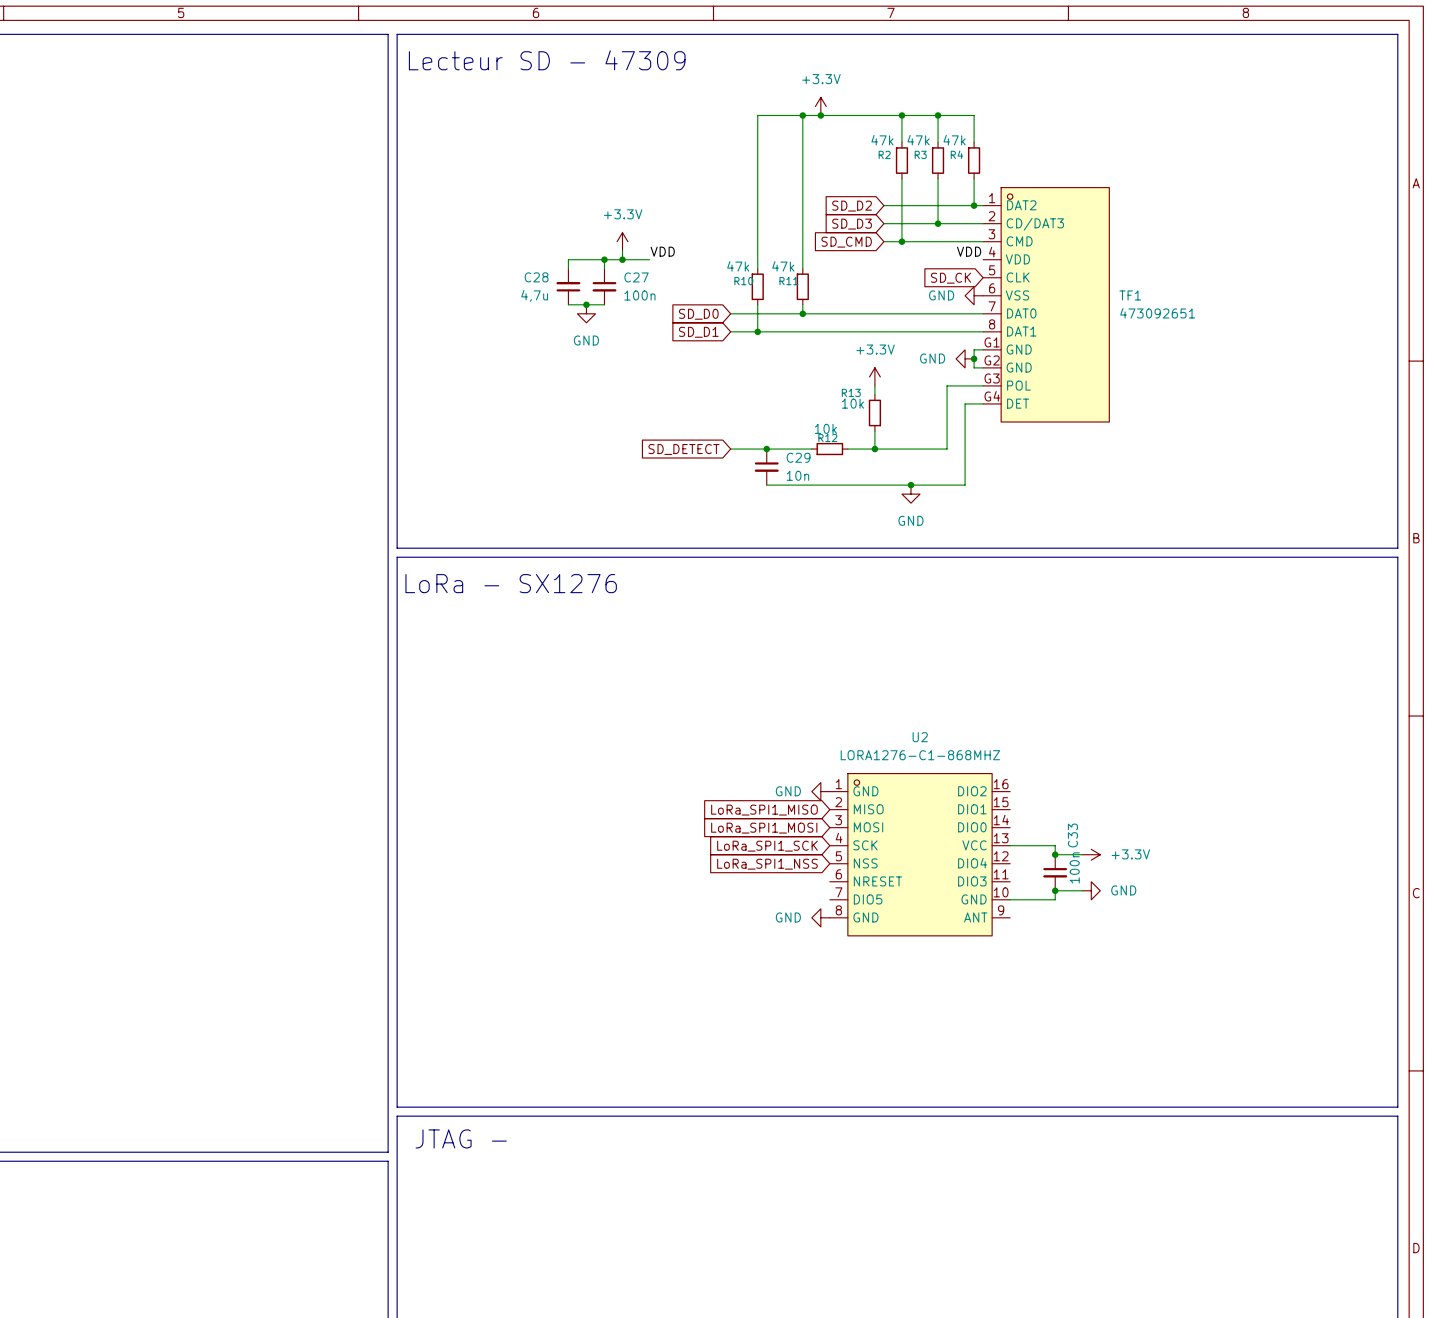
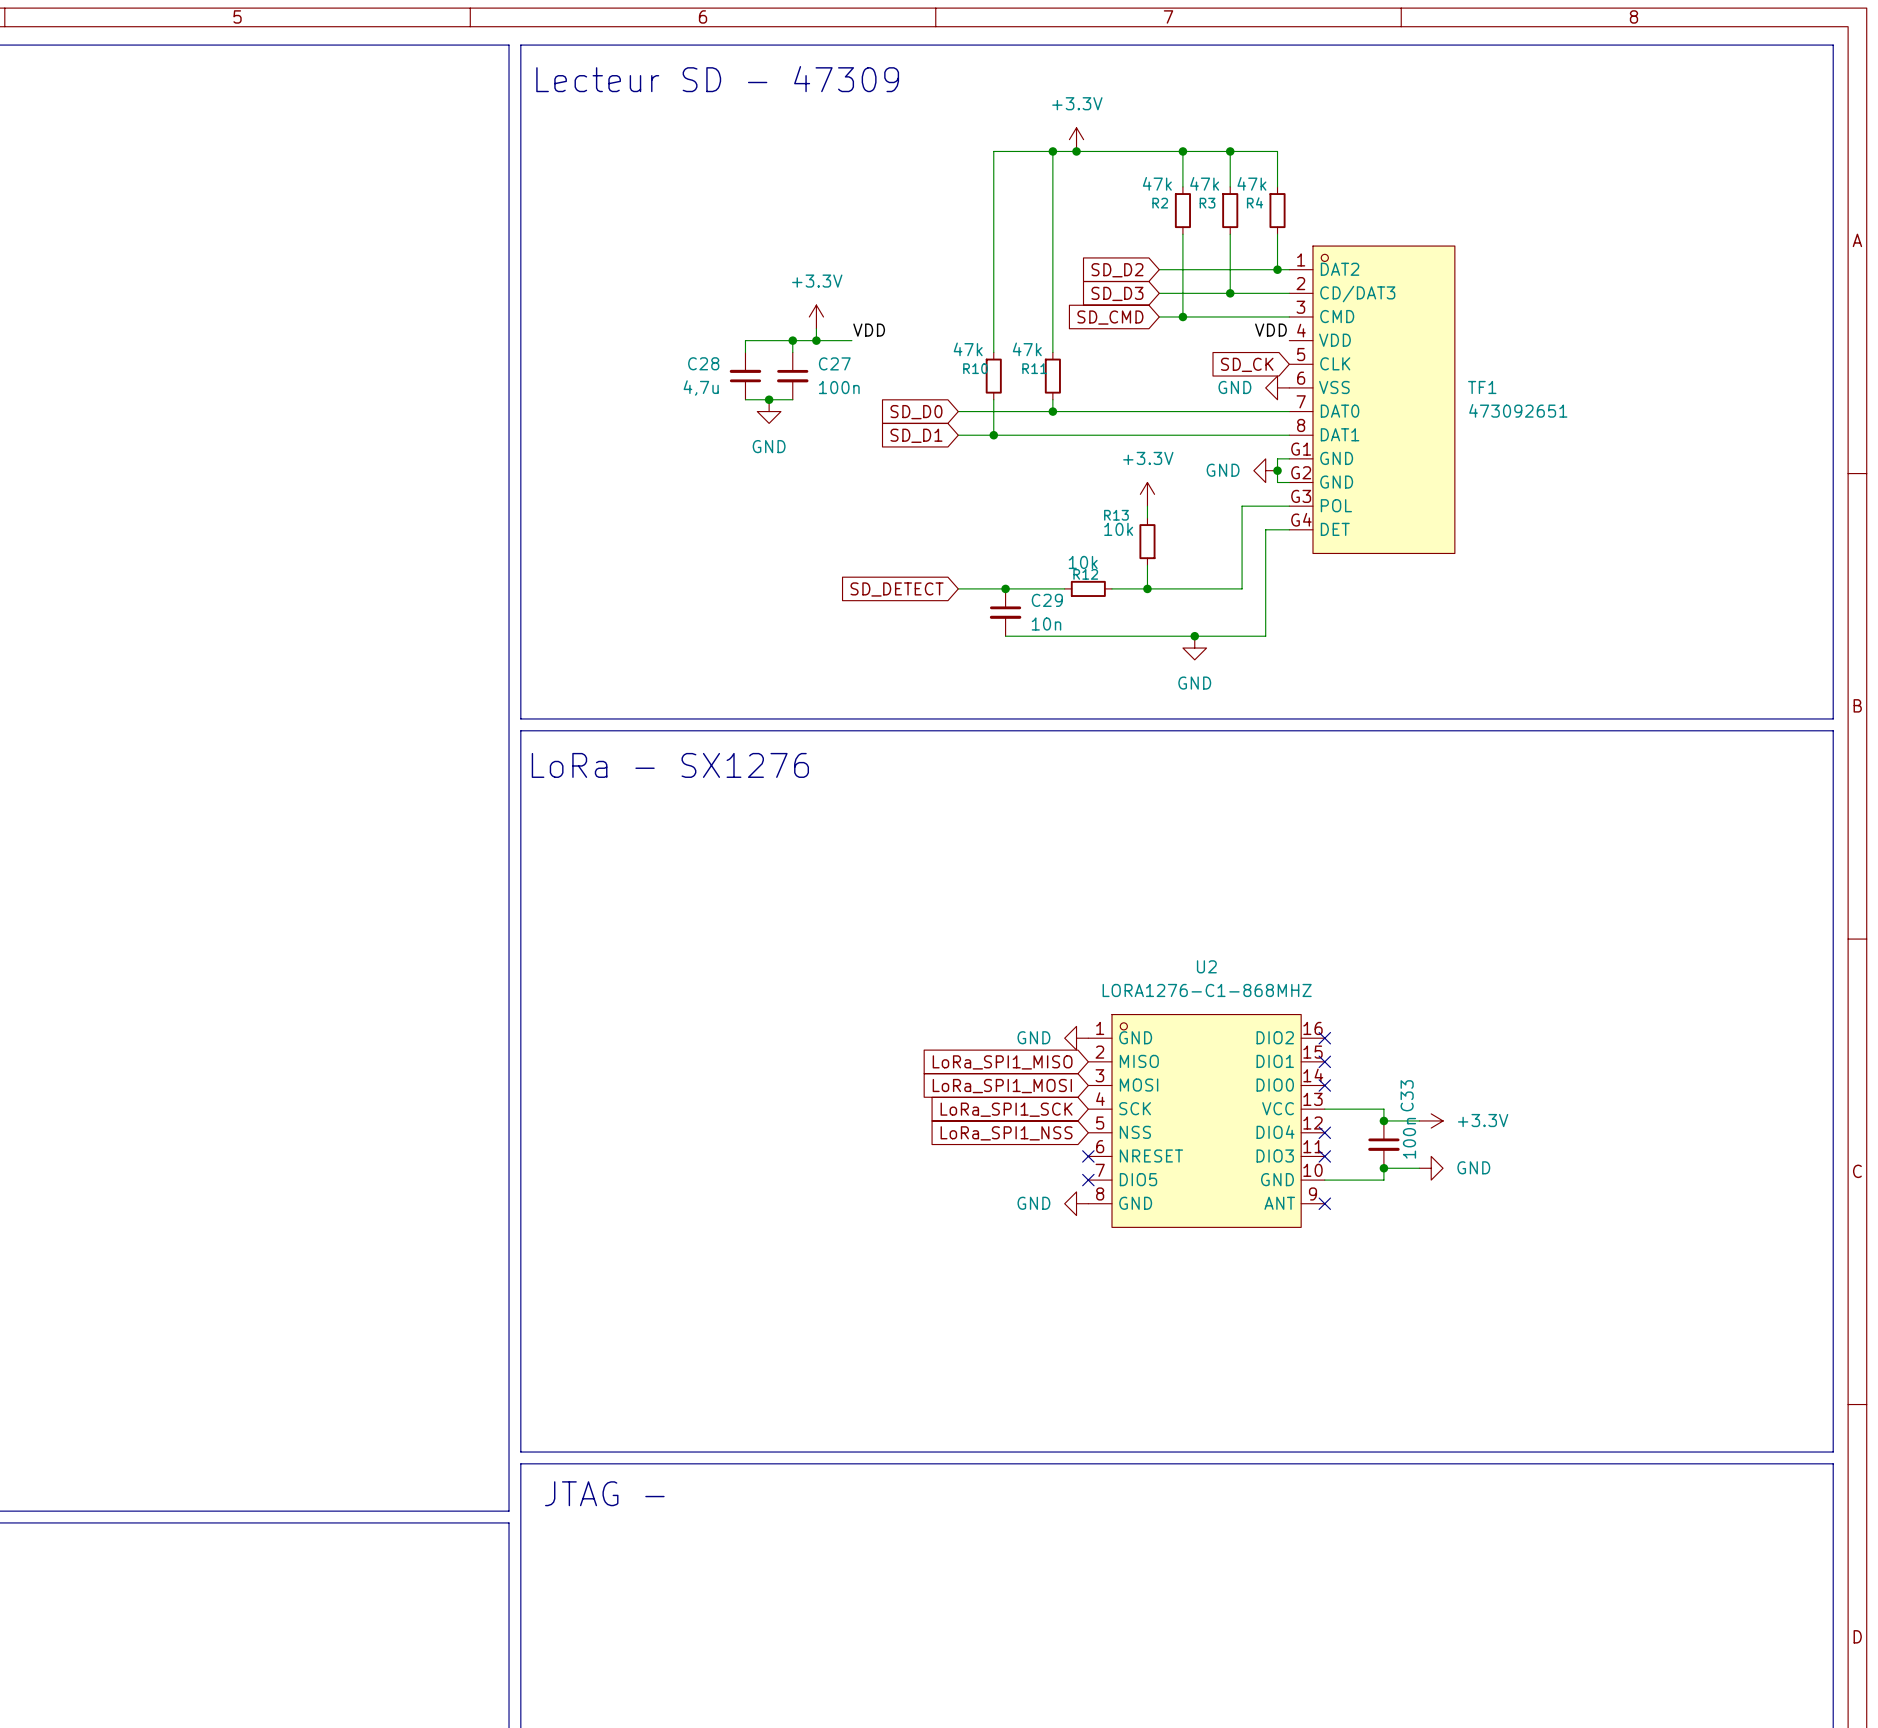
no-connect mark: none -> (1324, 1038)
no-connect mark: none -> (1324, 1061)
no-connect mark: none -> (1324, 1085)
no-connect mark: none -> (1324, 1132)
no-connect mark: none -> (1088, 1156)
no-connect mark: none -> (1324, 1156)
no-connect mark: none -> (1088, 1180)
no-connect mark: none -> (1324, 1203)

